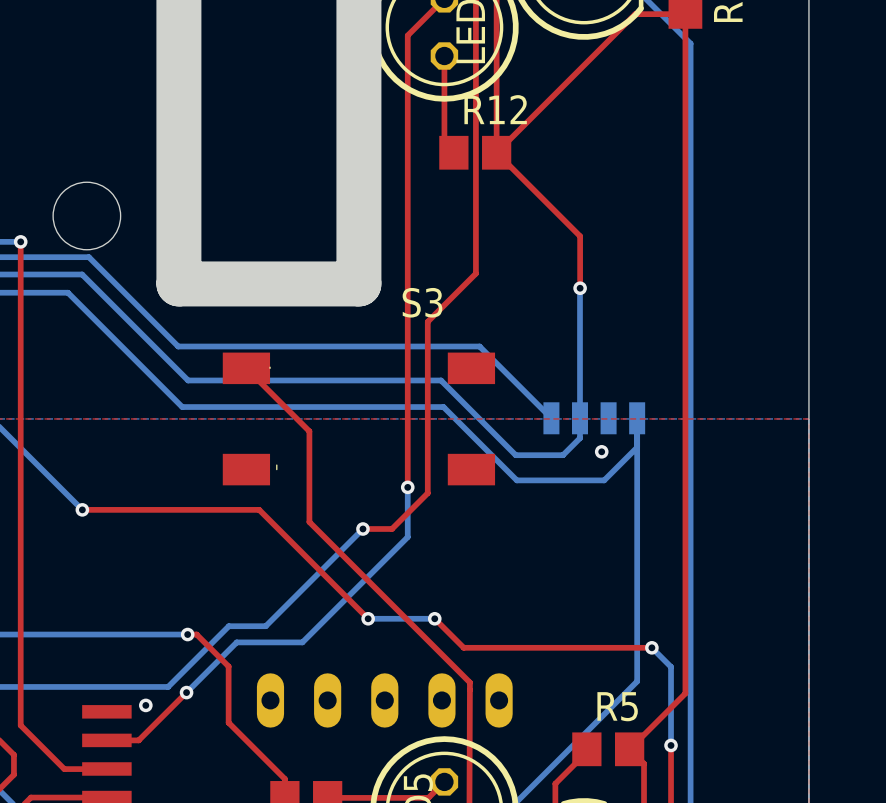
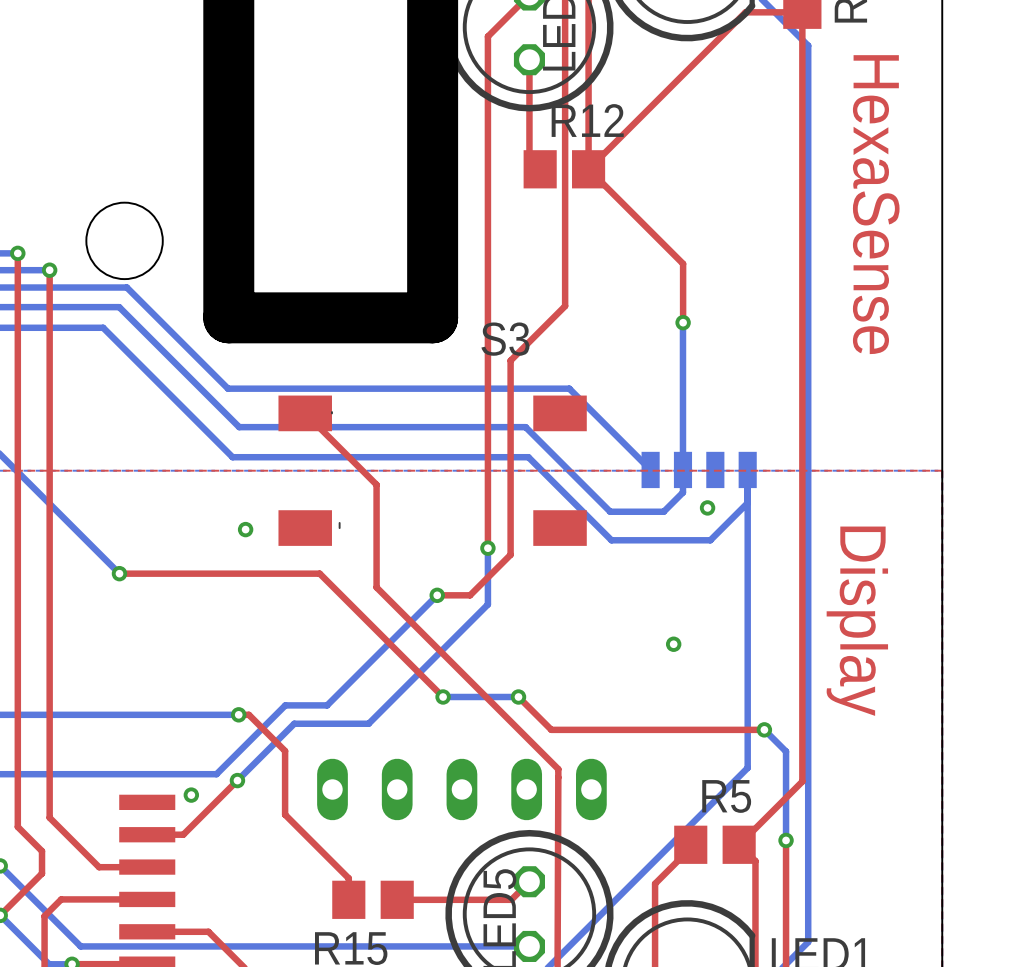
text: none -> HexaSense (876, 204)
via: none -> (245, 529)
text: none -> Display (857, 621)
via: none -> (673, 644)

